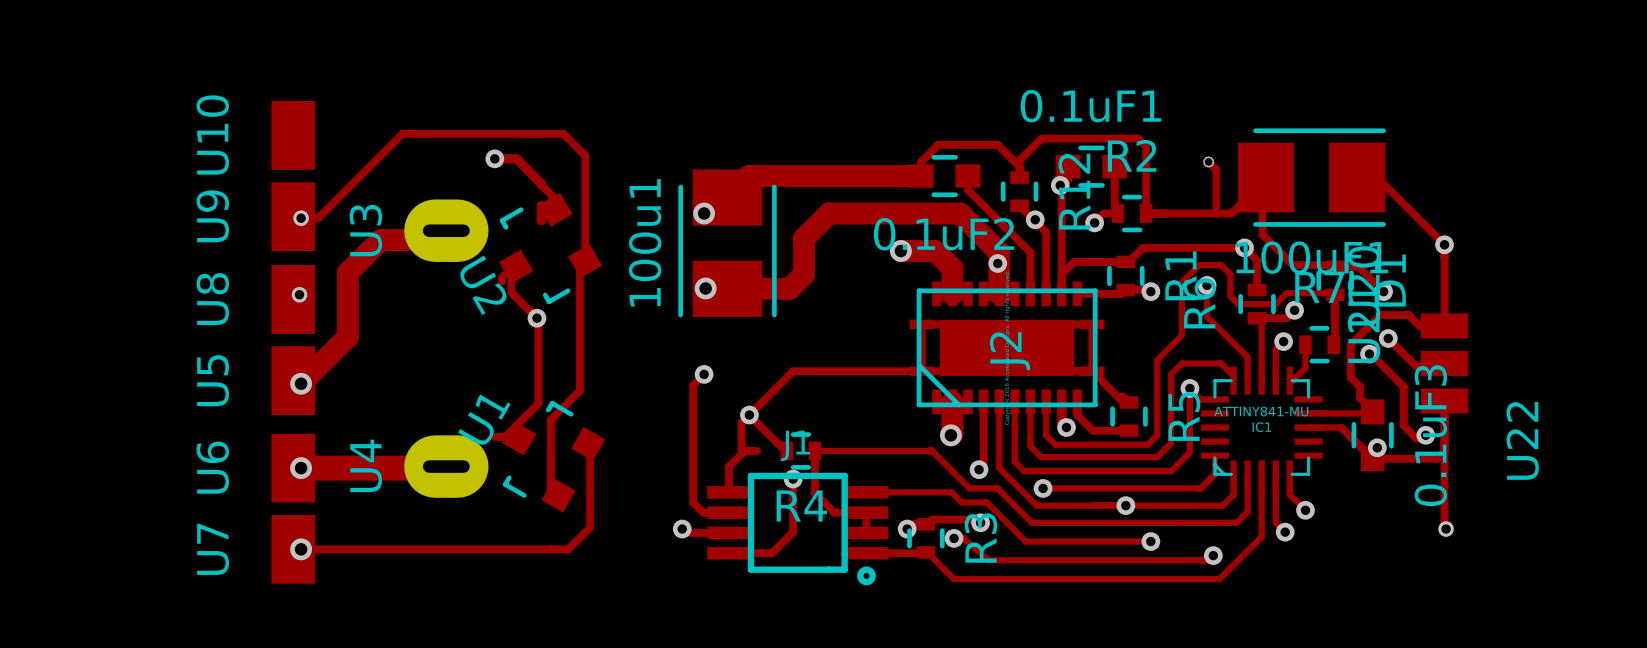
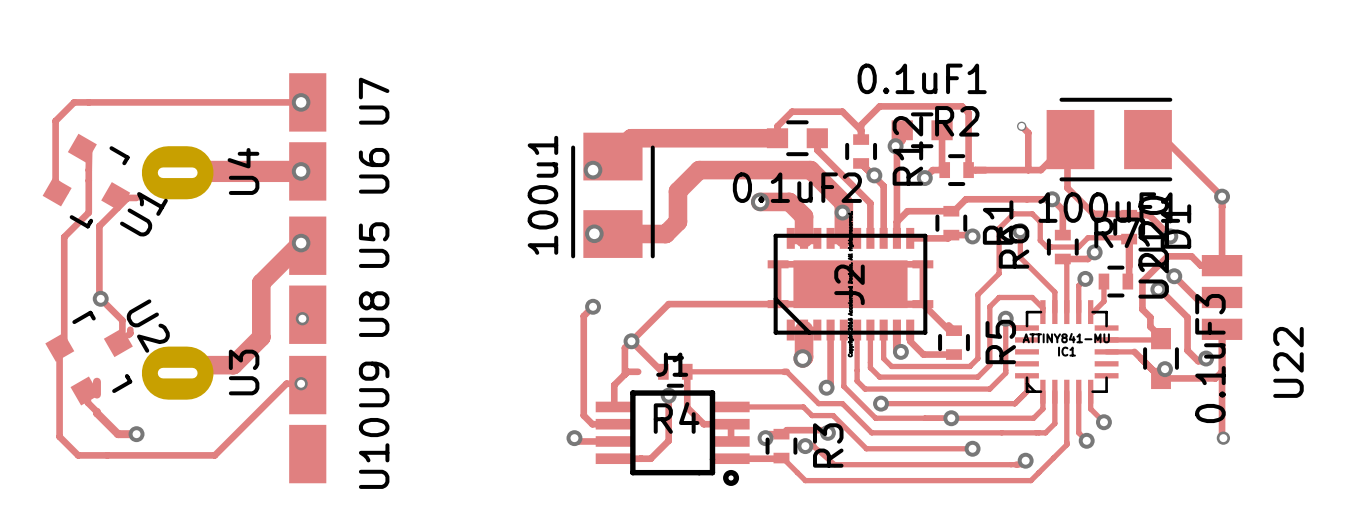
track: none -> (301, 102) (74, 102) (55, 120) (55, 181) (65, 191)
via: none -> (301, 102)
U10 name position: U10 (212, 134) -> U10 (374, 453)
U10 position: (293, 135) -> (307, 454)
track: (494, 158) (516, 158) (552, 195) (552, 211) -> none
via: (494, 158) -> none
track: none -> (89, 150) (88, 212) (64, 237) (64, 348) (59, 353) (59, 436) (78, 455) (214, 455) (286, 383) (301, 382)
track: (541, 205) (541, 220) -> (96, 381) (96, 394)
via: none -> (301, 171)
U9 name position: U9 (212, 216) -> U9 (374, 384)
U9 position: (293, 216) -> (307, 385)
via: (301, 218) -> none
track: (301, 219) (301, 218) (318, 218) (402, 133) (563, 133) (585, 155) (585, 253) (579, 259) (579, 390) (551, 419) (550, 492) -> none
U3 name position: U3 (365, 230) -> U3 (244, 372)
U3 position: (446, 230) -> (177, 373)
track: (444, 240) (380, 240) (347, 272) (347, 336) (301, 383) -> none
track: none -> (136, 197) (127, 197) (99, 226) (99, 298)
U2 rotation: 0° (550, 248) -> 180° (89, 358)
U2 position: (550, 248) -> (89, 358)
track: (511, 266) (511, 292) (536, 318) -> none
track: (504, 275) (502, 281) -> none
via: (299, 294) -> none
U8 name position: U8 (212, 299) -> U8 (374, 314)
U8 position: (293, 299) -> (307, 314)
track: none -> (301, 243) (261, 282) (261, 337) (233, 365) (179, 365)
via: none -> (301, 243)
via: (536, 318) -> none
track: (538, 318) (538, 403) (505, 436) (494, 436) -> none
track: none -> (100, 298) (122, 320) (122, 342)
via: none -> (100, 298)
U5 name position: U5 (213, 380) -> U5 (374, 245)
U5 position: (293, 380) -> (307, 245)
via: (301, 383) -> none
via: none -> (302, 318)
track: none -> (130, 329) (128, 335)
track: (578, 444) (590, 456) (590, 527) (568, 549) (301, 549) -> none
U1 rotation: 0° (553, 456) -> 180° (86, 181)
U1 position: (553, 456) -> (86, 181)
via: none -> (301, 383)
U4 name position: U4 (366, 465) -> U4 (243, 171)
U4 position: (446, 466) -> (177, 172)
U6 name position: U6 (212, 467) -> U6 (374, 170)
U6 position: (293, 468) -> (307, 171)
track: (301, 468) (429, 468) -> (192, 171) (301, 171)
via: (301, 468) -> none
track: none -> (87, 389) (87, 402) (117, 434) (136, 434)
via: none -> (136, 434)
U7 name position: U7 (213, 549) -> U7 (374, 101)
U7 position: (293, 549) -> (307, 102)
via: (301, 549) -> none

